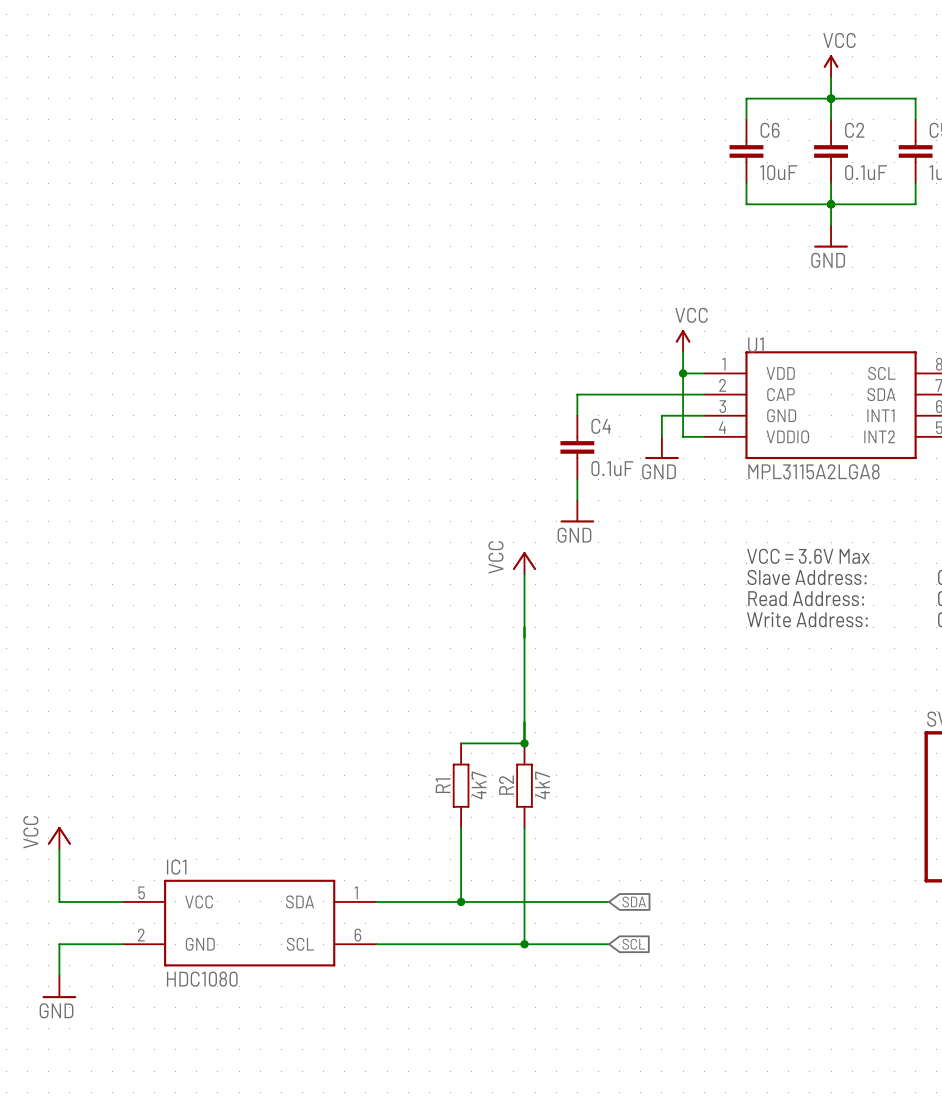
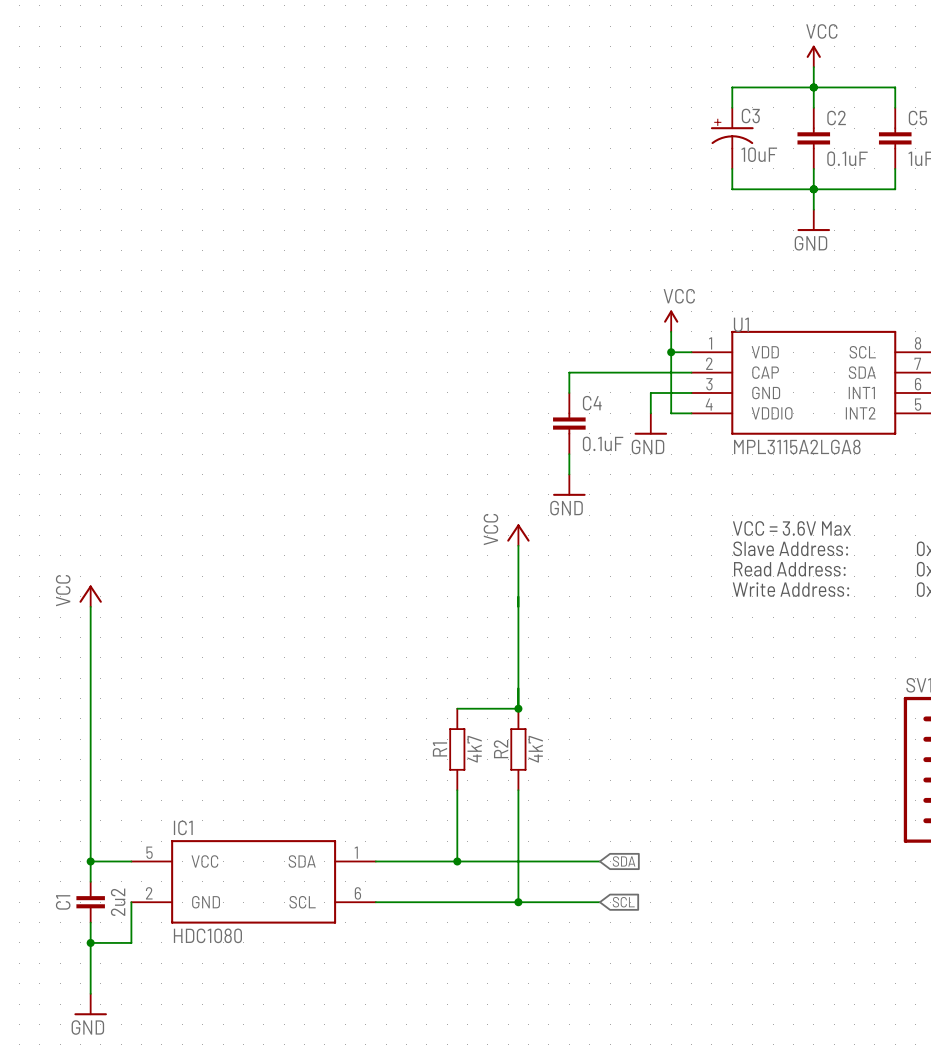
C6: 10uF (746, 151) -> none
C3: none -> 10uF (732, 138)
power symbol: none -> VCC (90, 596)
wire: none -> (90, 606) (90, 881)
power symbol: VCC (59, 838) -> none
wire: (59, 849) (59, 901) (80, 901) -> none
junction: none -> (90, 861)
C1: none -> 2u2 (90, 902)
wire: (122, 944) (59, 944) (59, 975) -> (131, 902) (131, 942) (90, 942)
wire: none -> (90, 922) (90, 993)
junction: none -> (90, 942)
power symbol position: GND (59, 987) -> GND (90, 1004)

